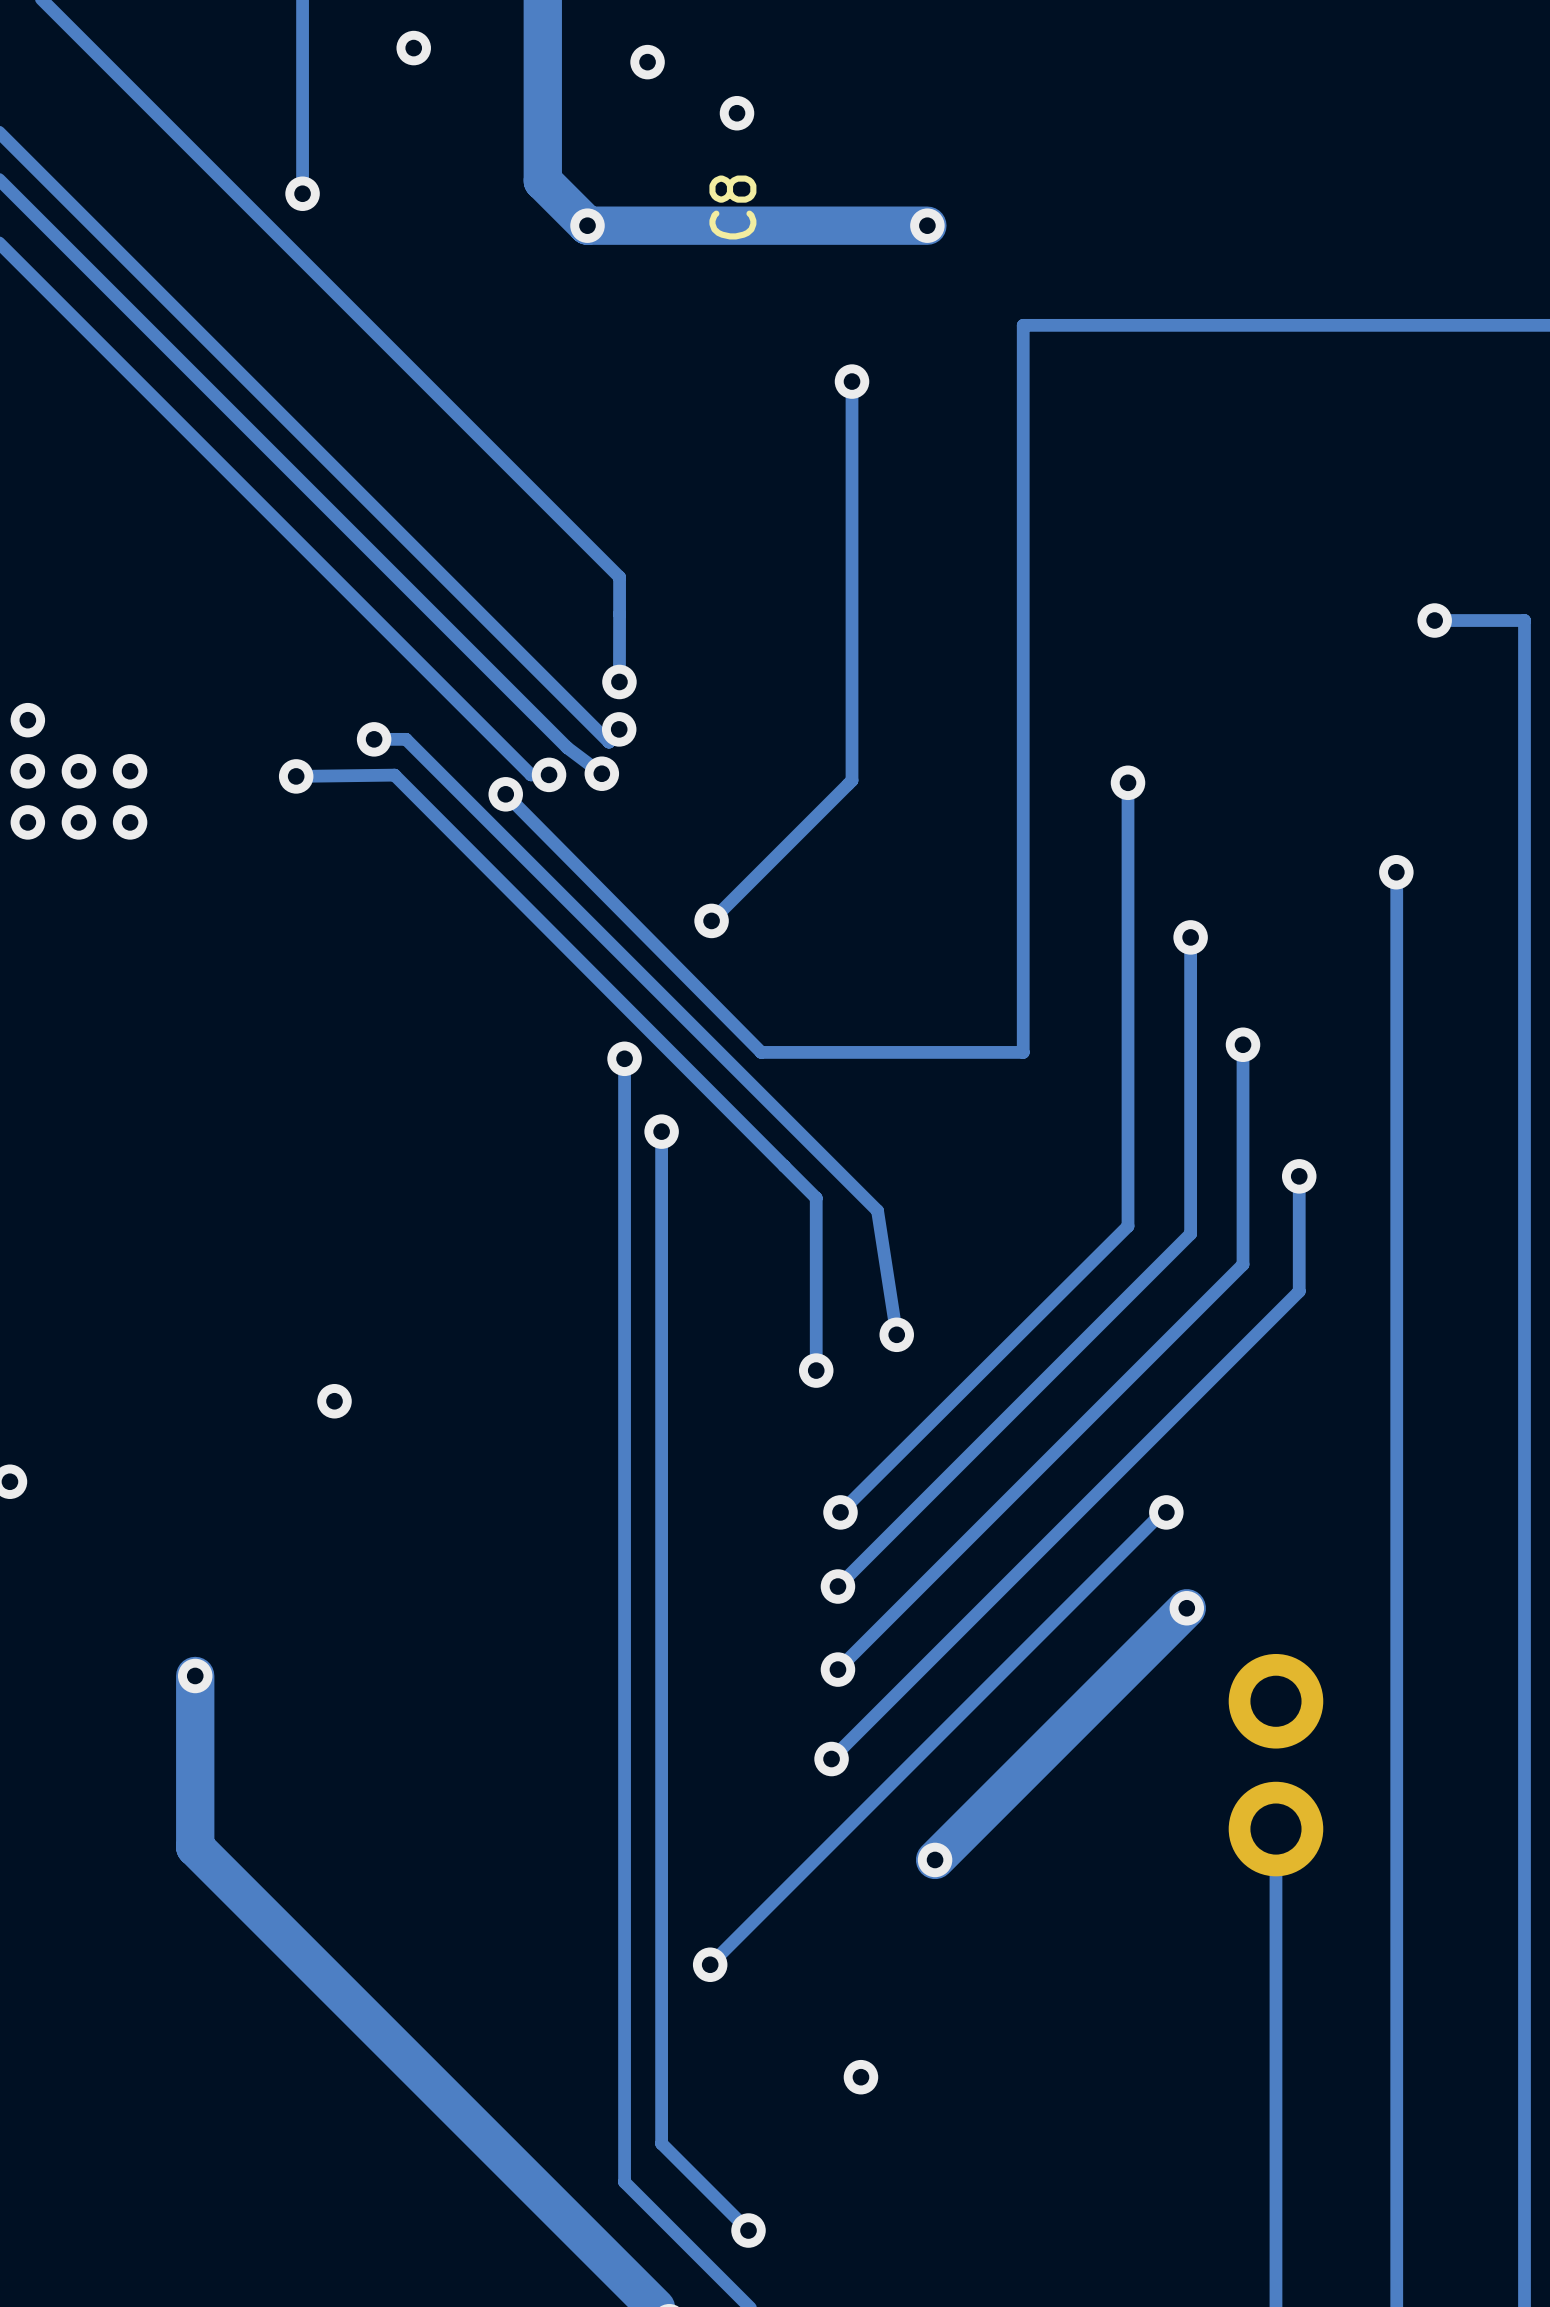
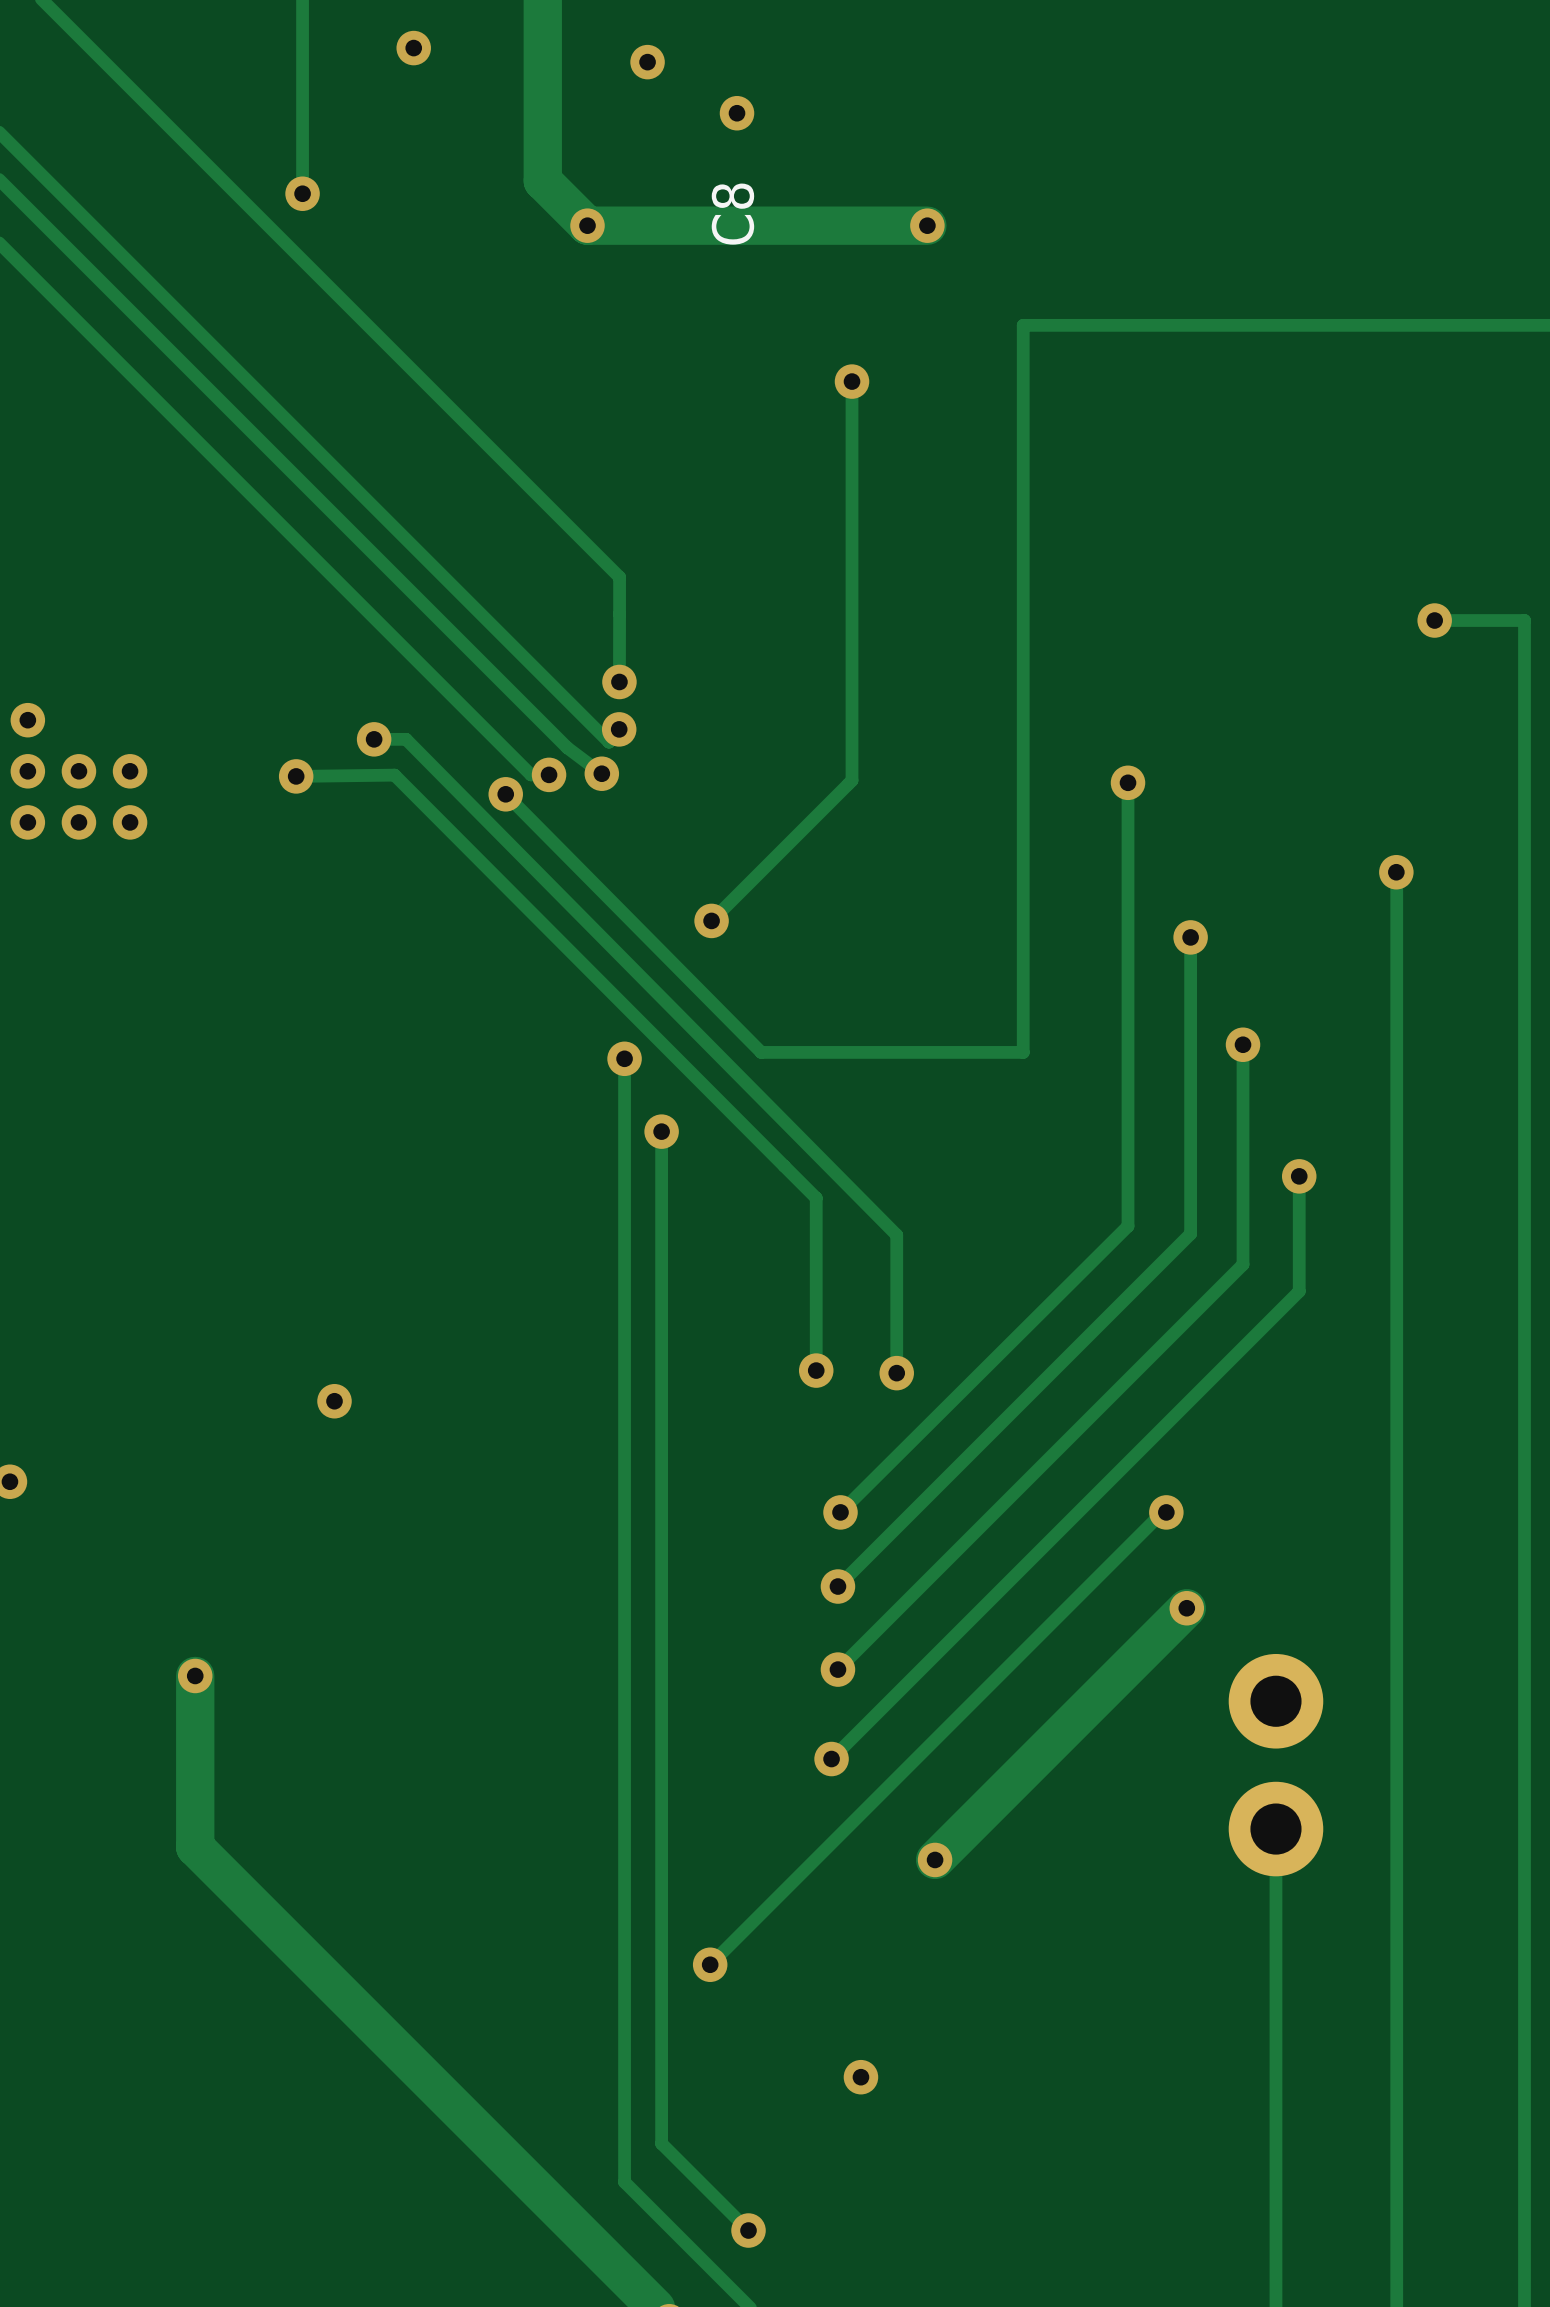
track: (406, 739) (877, 1210) (896, 1334) -> (406, 739) (896, 1235) (896, 1373)
via position: (896, 1334) -> (896, 1373)

